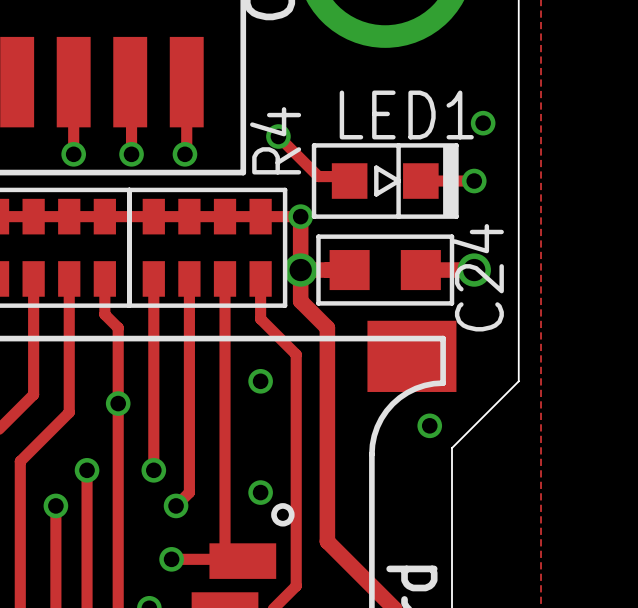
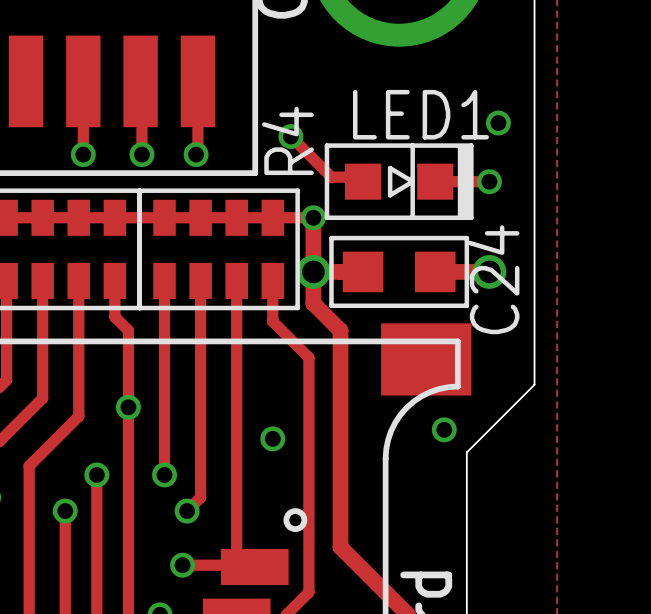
via: (260, 381) -> none
via: none -> (272, 438)
via: (260, 492) -> none

